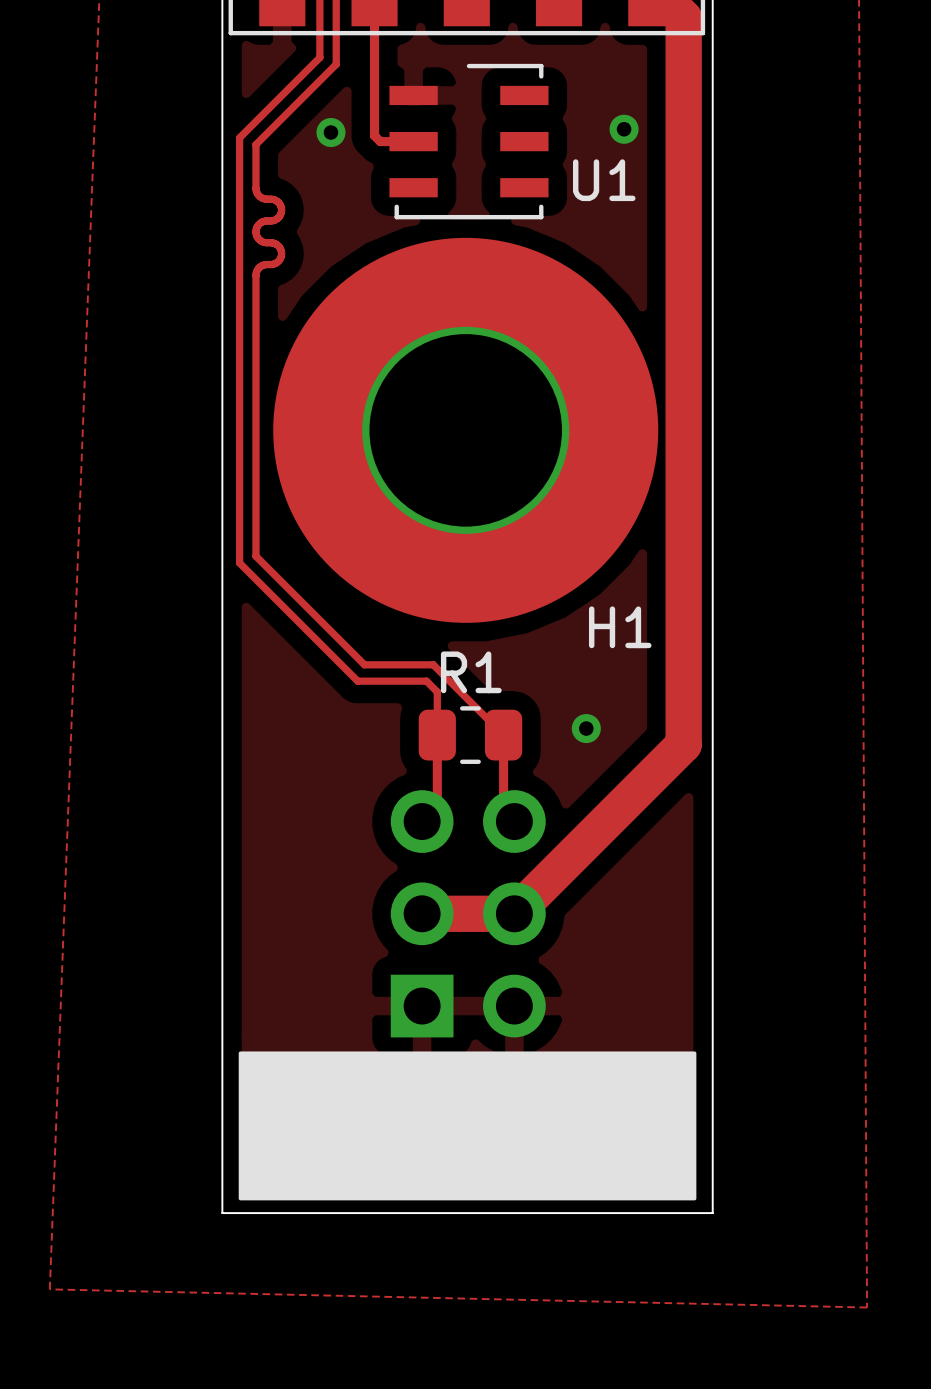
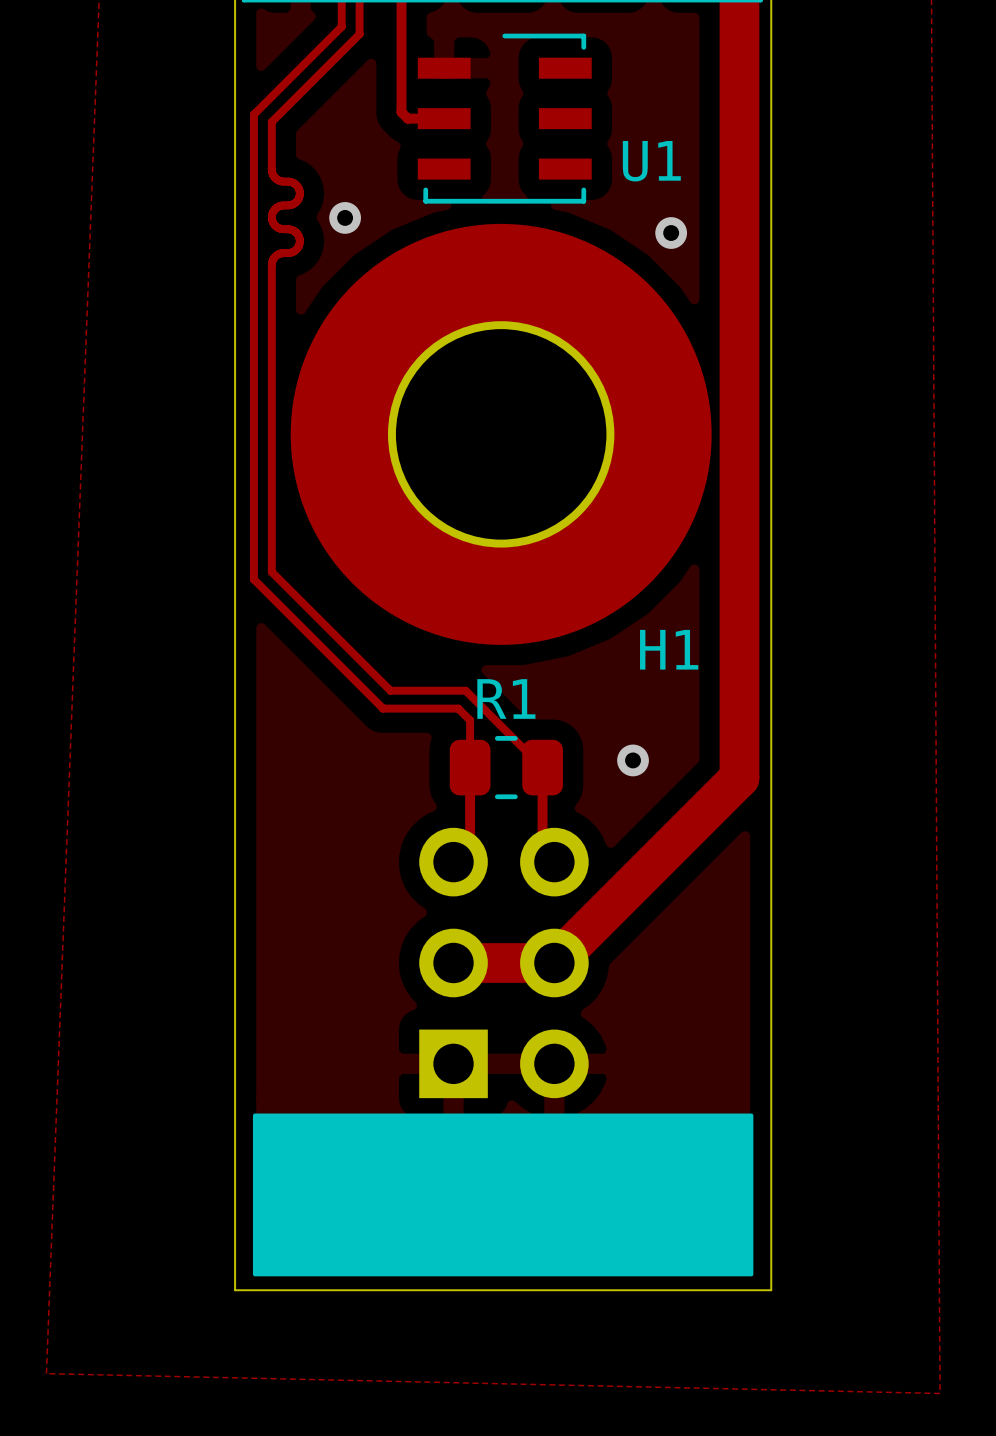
via position: (624, 129) -> (671, 233)
via position: (330, 132) -> (345, 217)

